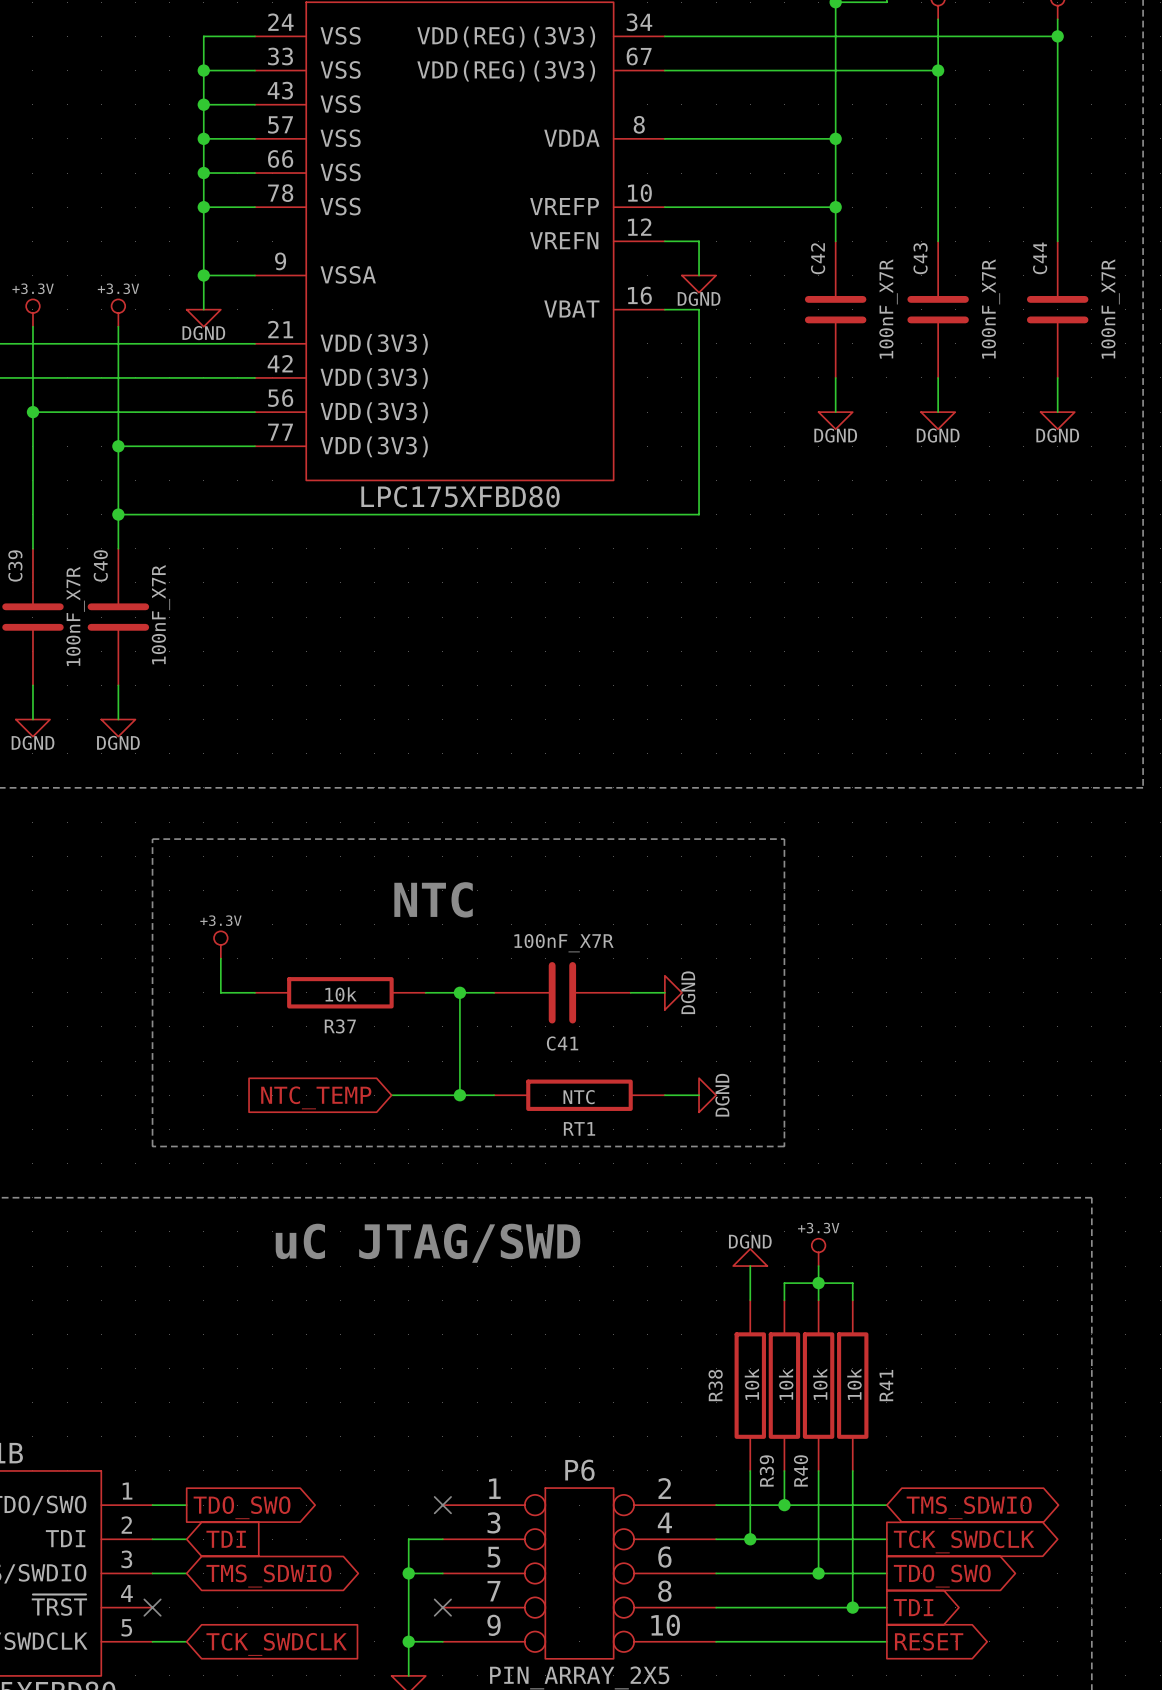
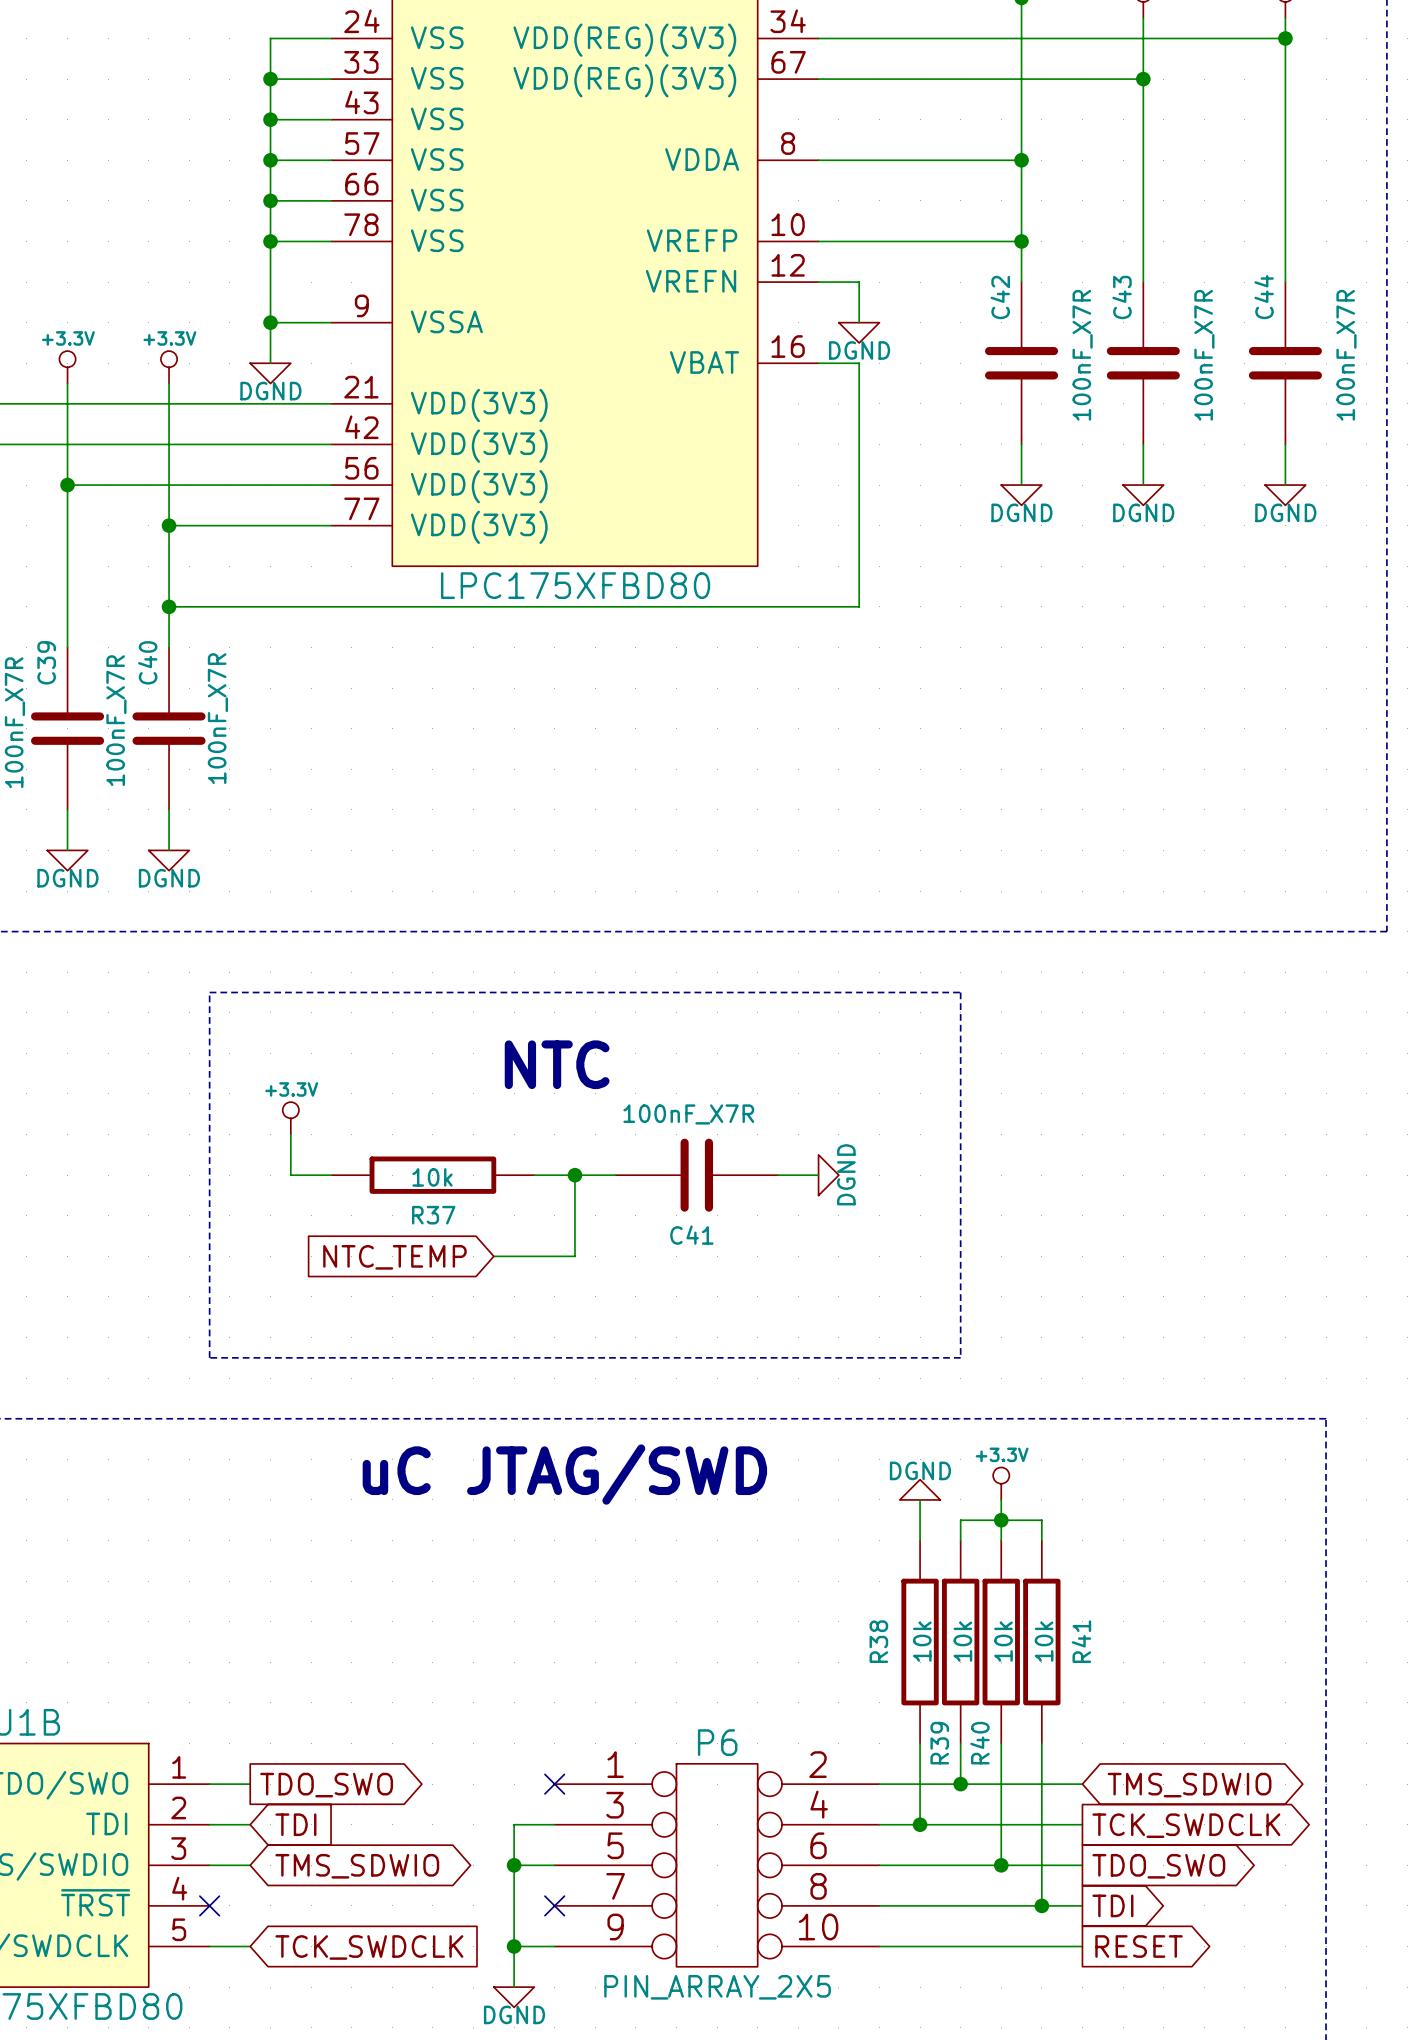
wire: (459, 1061) (459, 1095) -> (574, 1256) (493, 1256)
wire: (391, 1095) (494, 1095) -> none
junction: (459, 1095) -> none
RT1: NTC (579, 1095) -> none
wire: (664, 1095) (699, 1095) -> none
power symbol: DGND (707, 1095) -> none
global label position: NTC_TEMP (316, 1097) -> NTC_TEMP (394, 1257)

